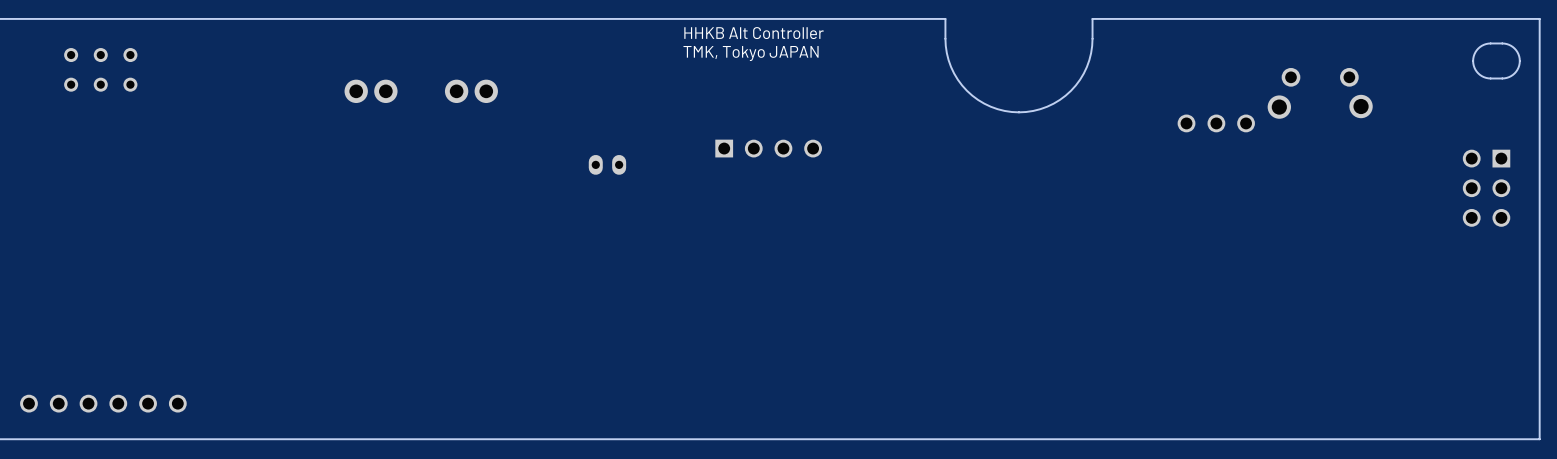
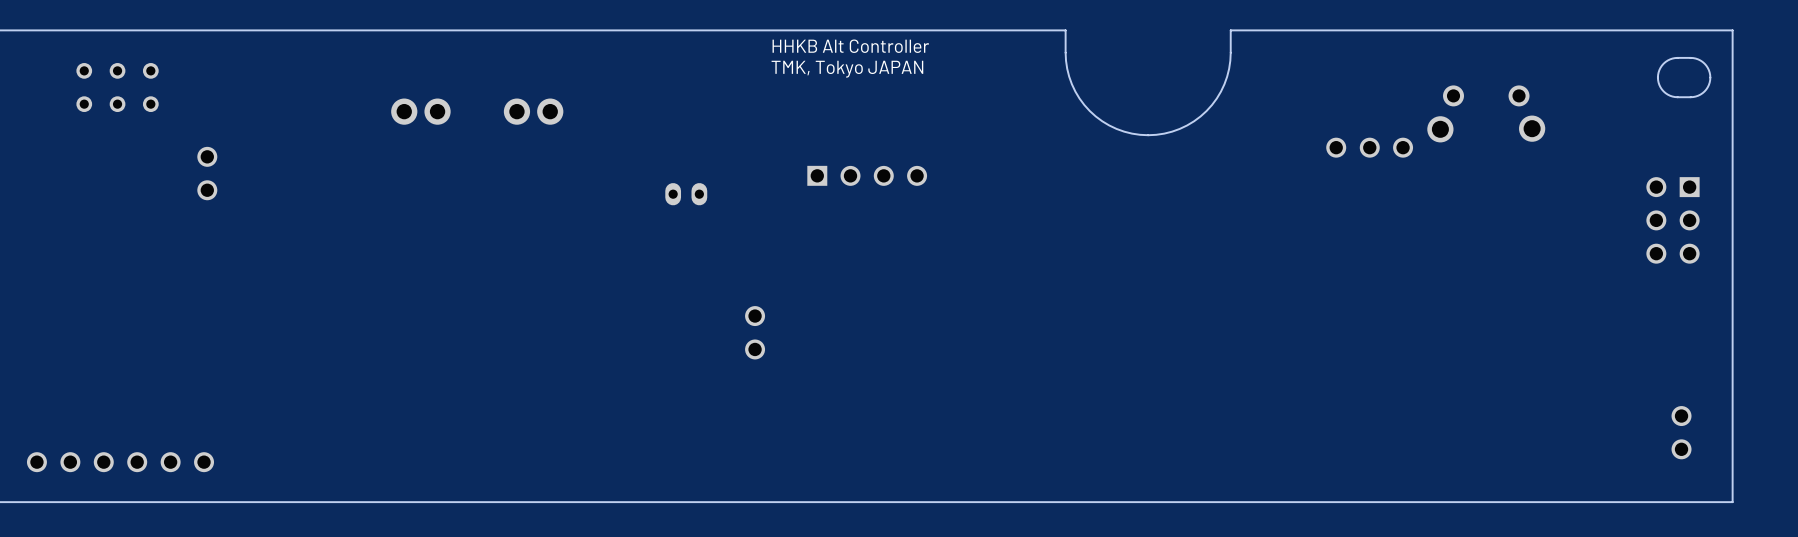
part: none -> (207, 156)
part: none -> (207, 190)
part: none -> (755, 316)
part: none -> (755, 349)
part: none -> (1681, 416)
part: none -> (1681, 449)

